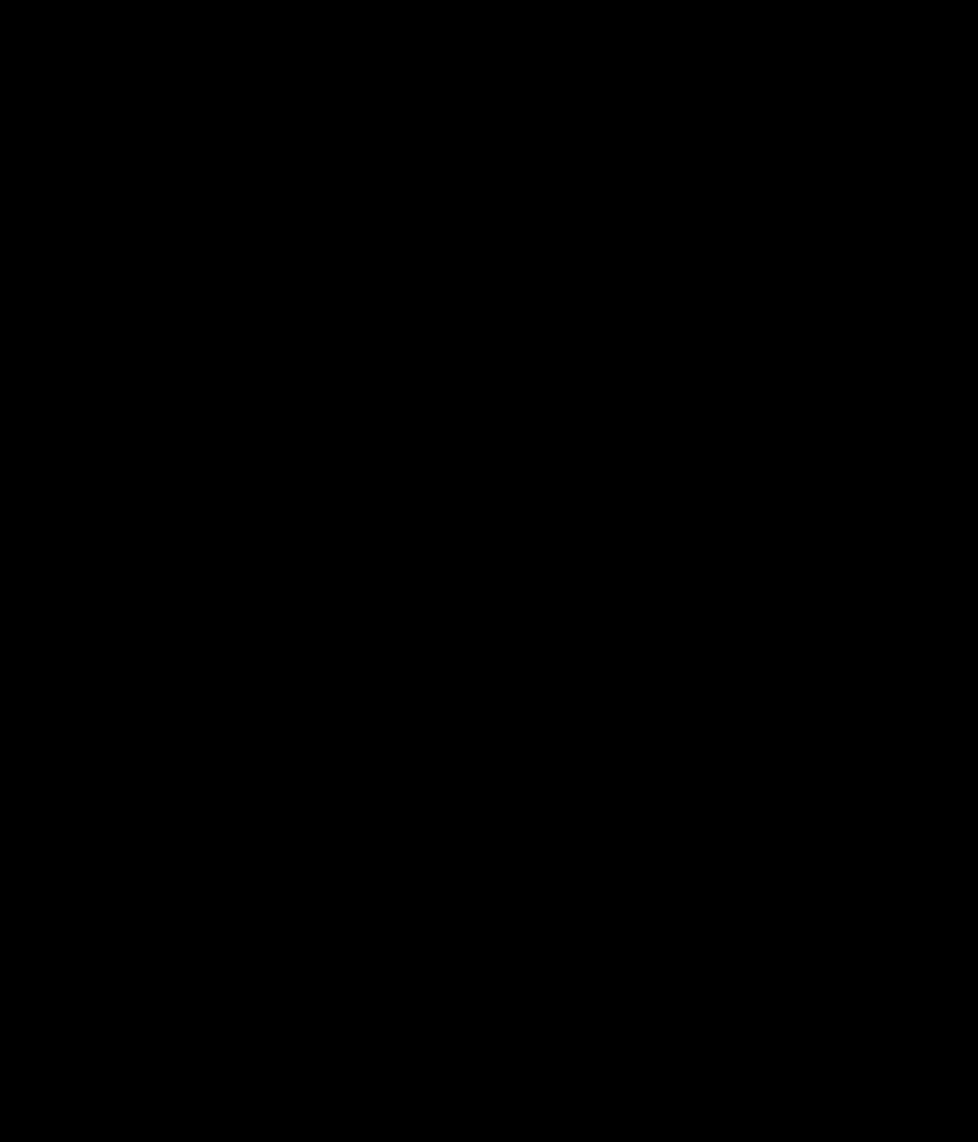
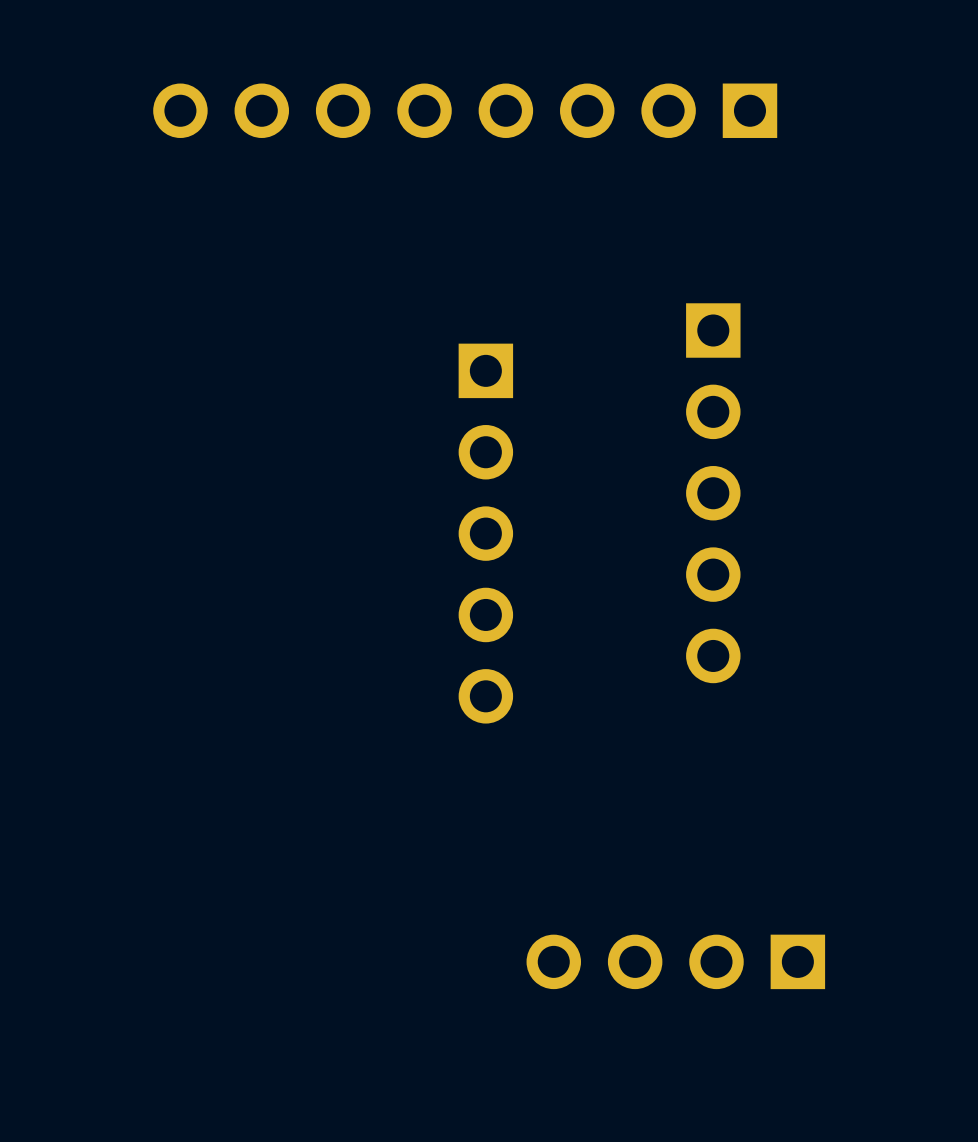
part: none -> (465, 110)
part: none -> (713, 493)
part: none -> (485, 533)
part: none -> (675, 961)

